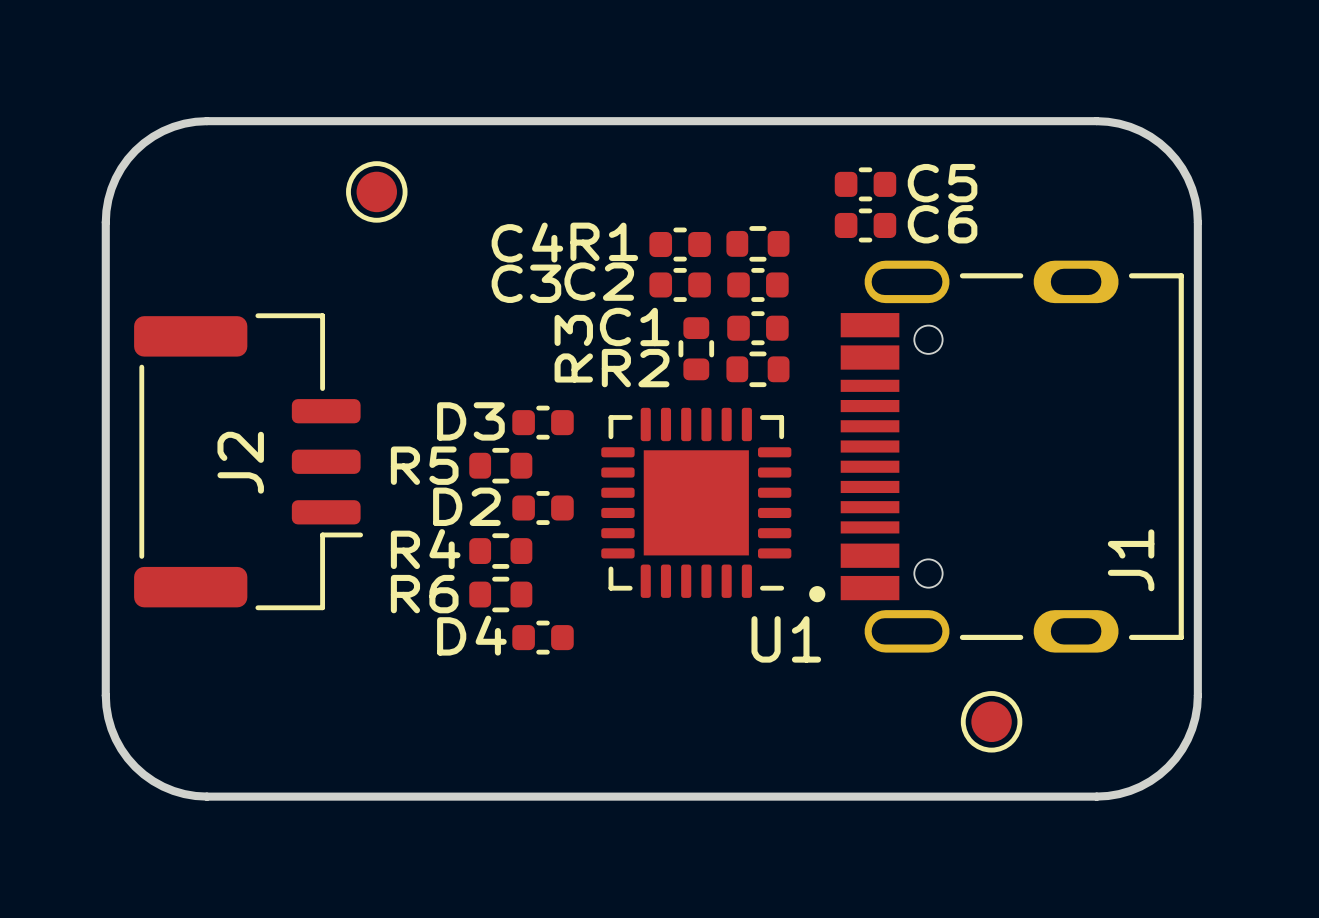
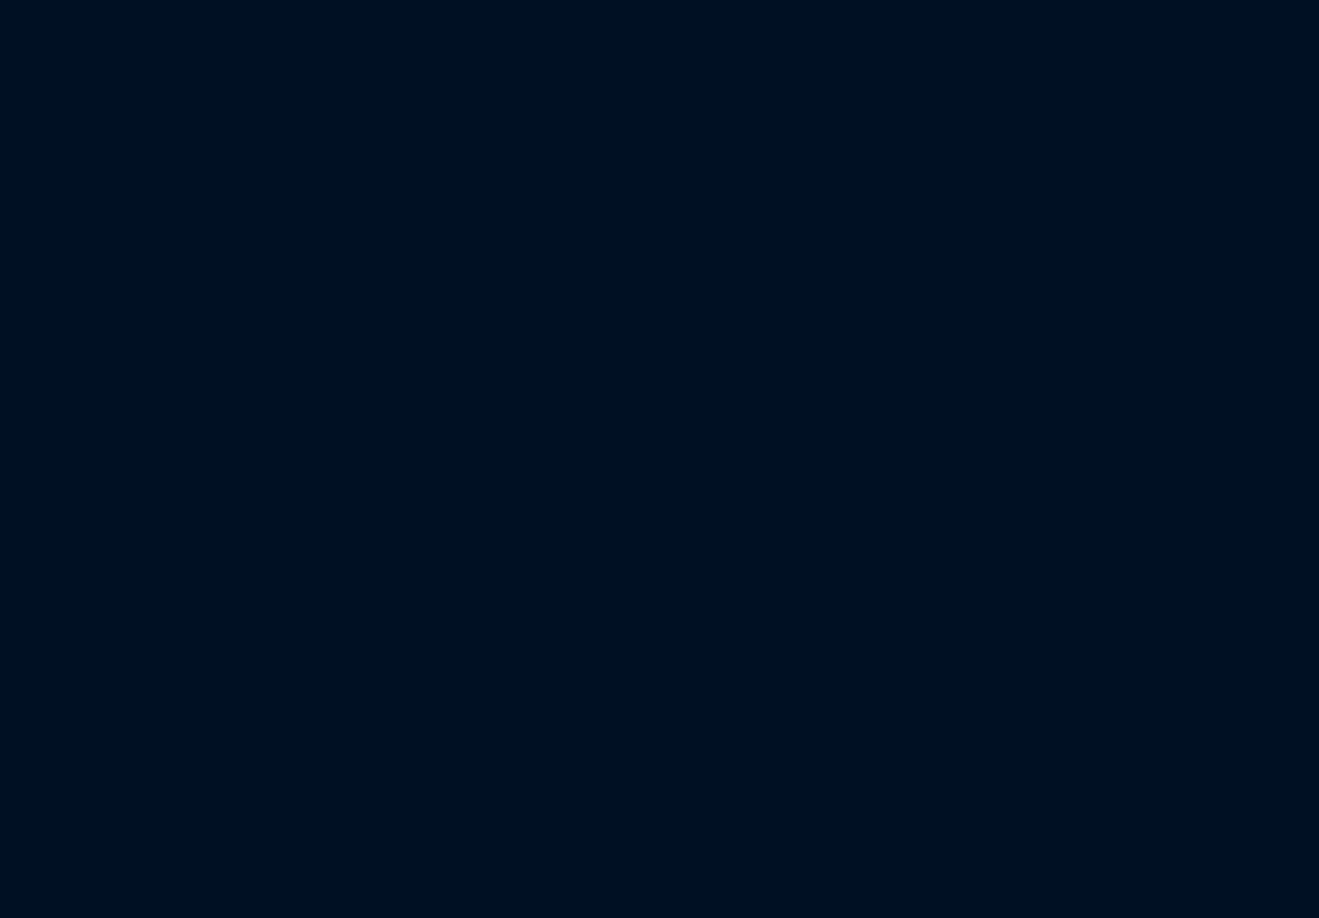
board edge: (206, 121) (1096, 121) (1119, 123) (1150, 136) (1168, 150) (1187, 178) (1195, 199) (1197, 222) (1197, 695) (1195, 718) (1182, 749) (1159, 774) (1140, 786) (1119, 794) (1096, 796) (206, 796) (173, 790) (153, 781) (135, 767) (121, 749) (111, 728) (106, 706) (106, 210) (111, 188) (121, 168) (143, 143) (173, 126) (206, 121) -> none
C5: (865, 184) -> none
part: (376, 191) -> none
C6: (865, 225) -> none
R1: (757, 243) -> none
C4: (680, 244) -> none
C3: (680, 284) -> none
C2: (757, 284) -> none
C1: (757, 328) -> none
R3: (696, 348) -> none
R2: (757, 369) -> none
D3: (543, 422) -> none
J1: (996, 456) -> none
J2: (248, 461) -> none
R5: (500, 465) -> none
U1: (696, 502) -> none
D2: (543, 507) -> none
R4: (500, 551) -> none
R6: (500, 594) -> none
D4: (543, 637) -> none
part: (991, 721) -> none

